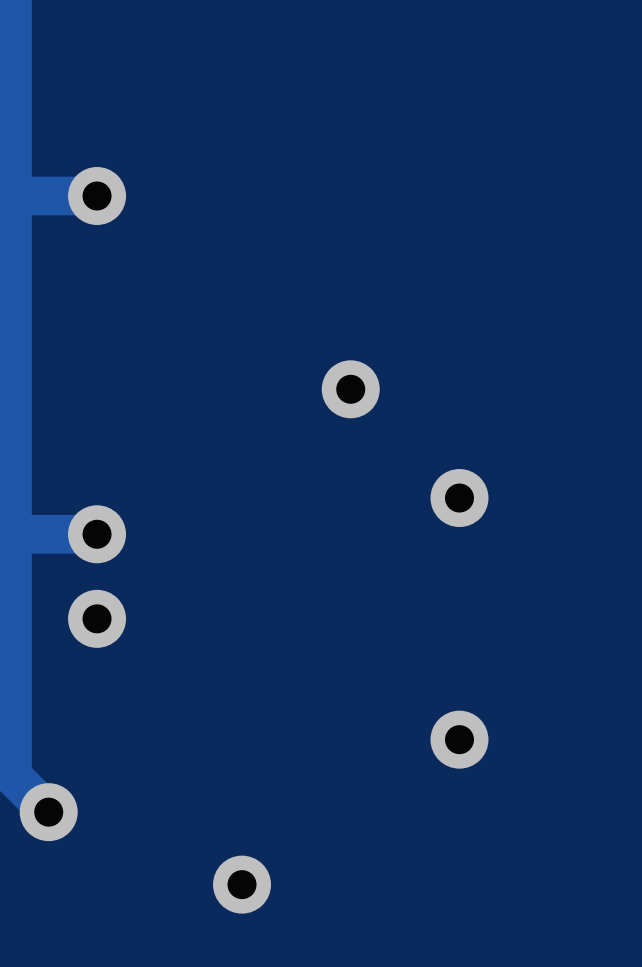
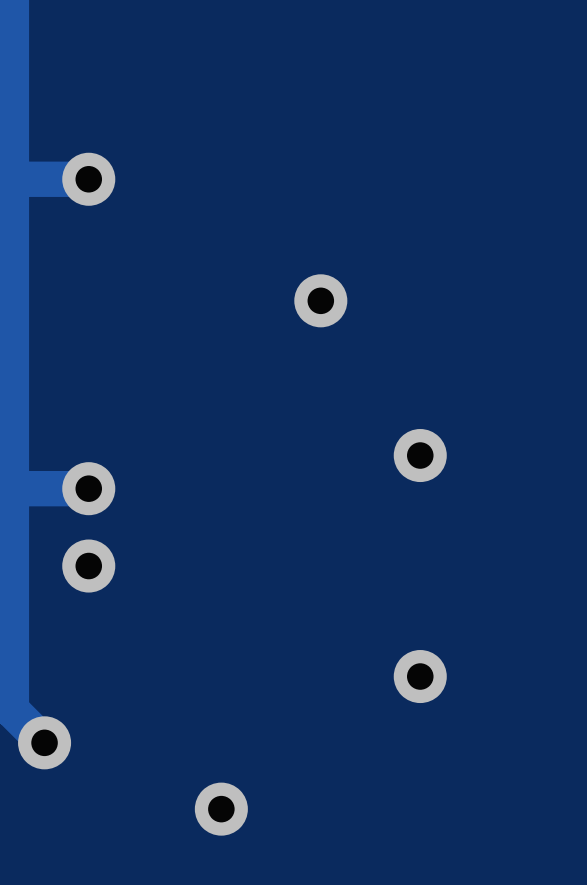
via position: (350, 389) -> (320, 300)

